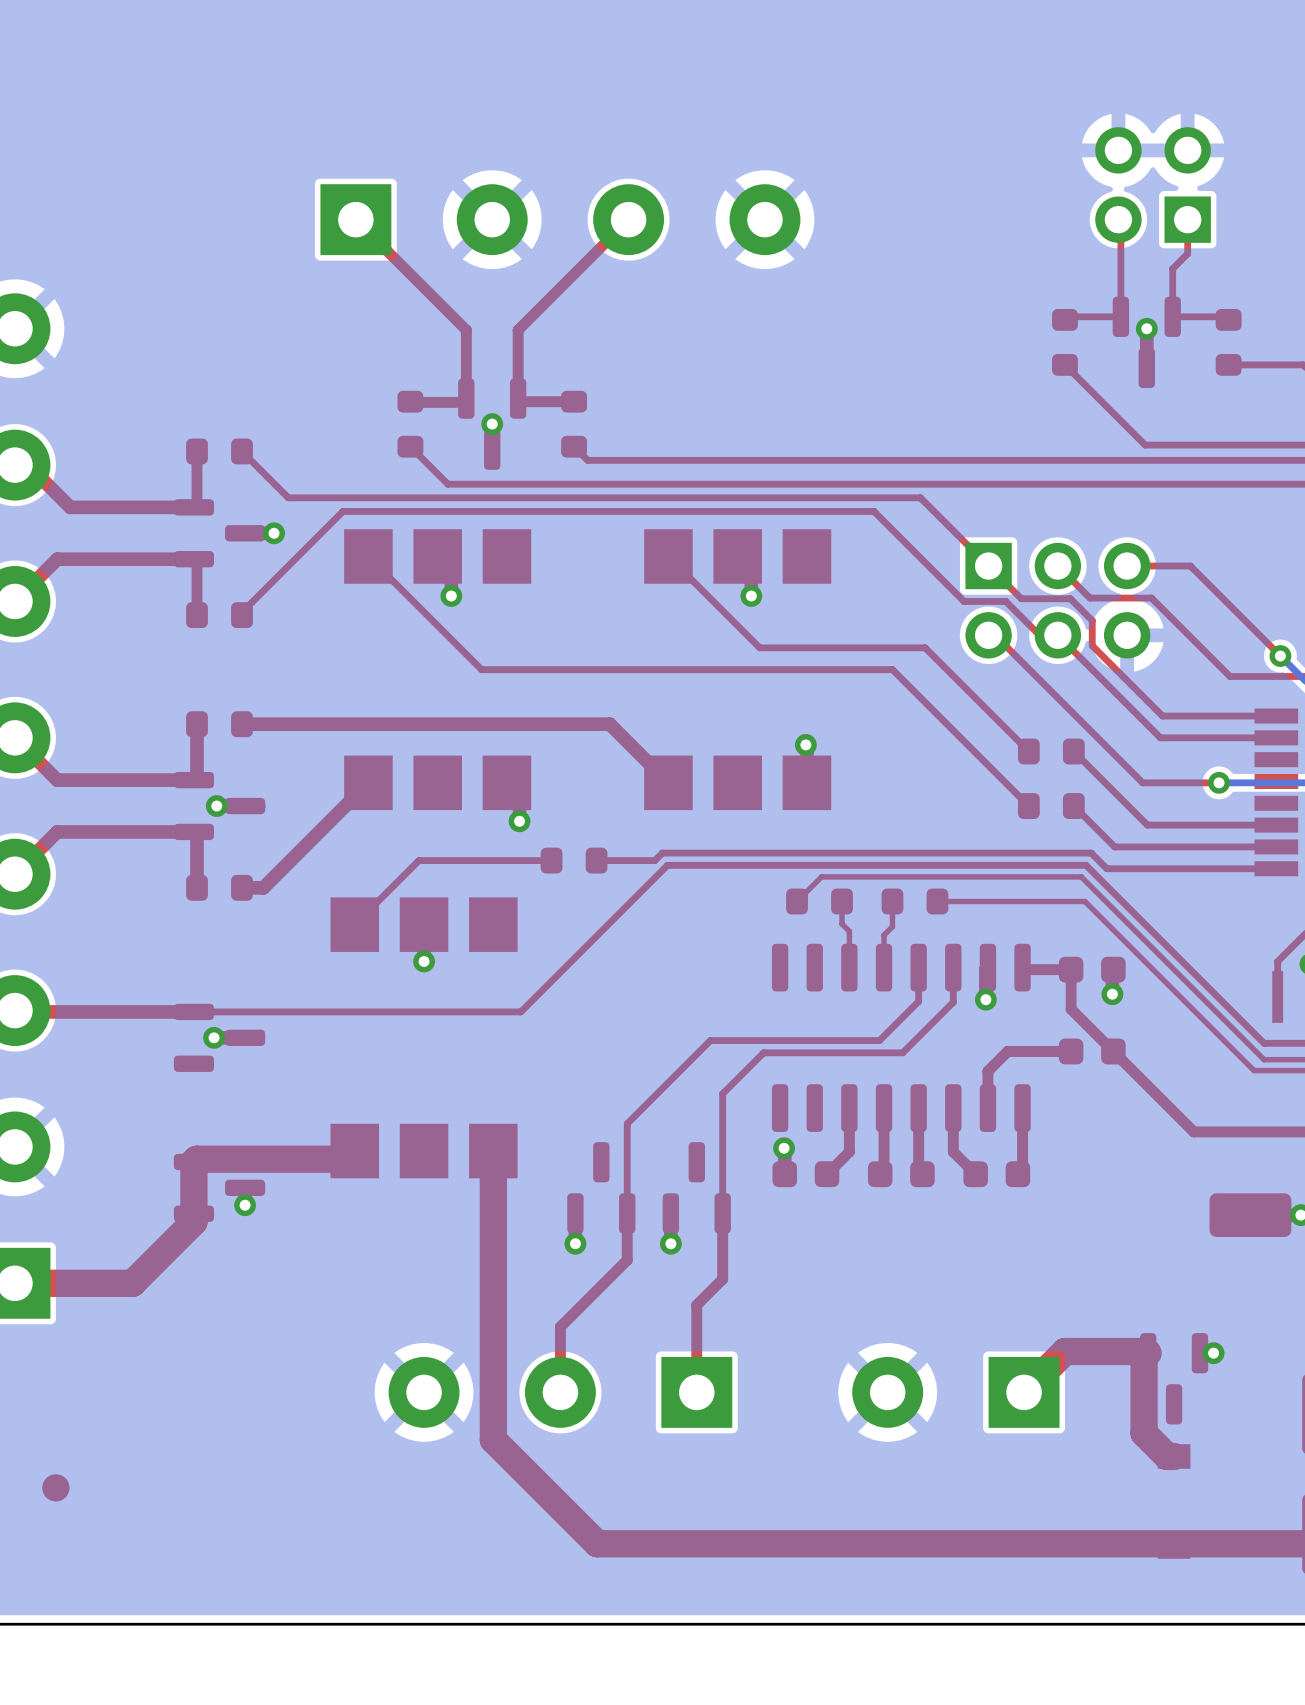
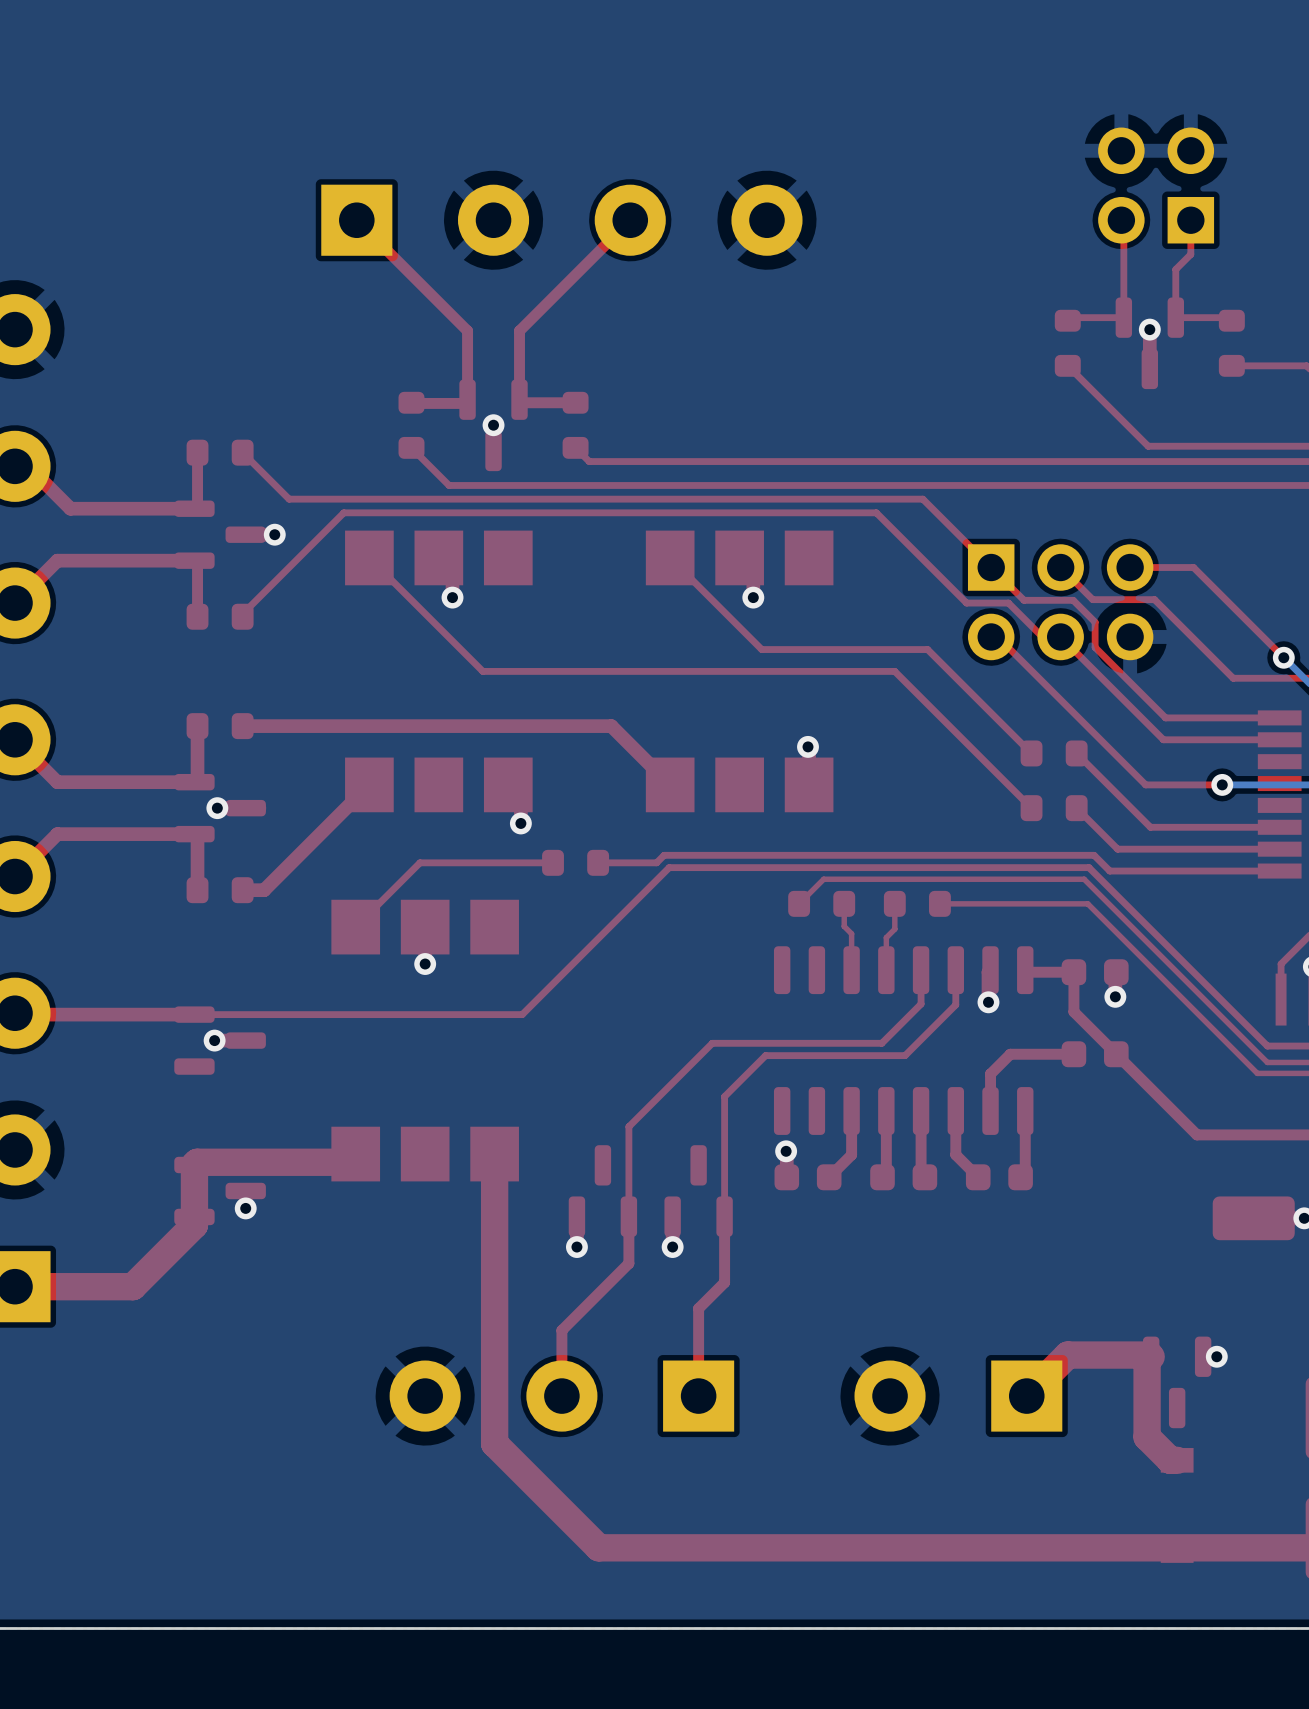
part: (55, 1487) -> none

